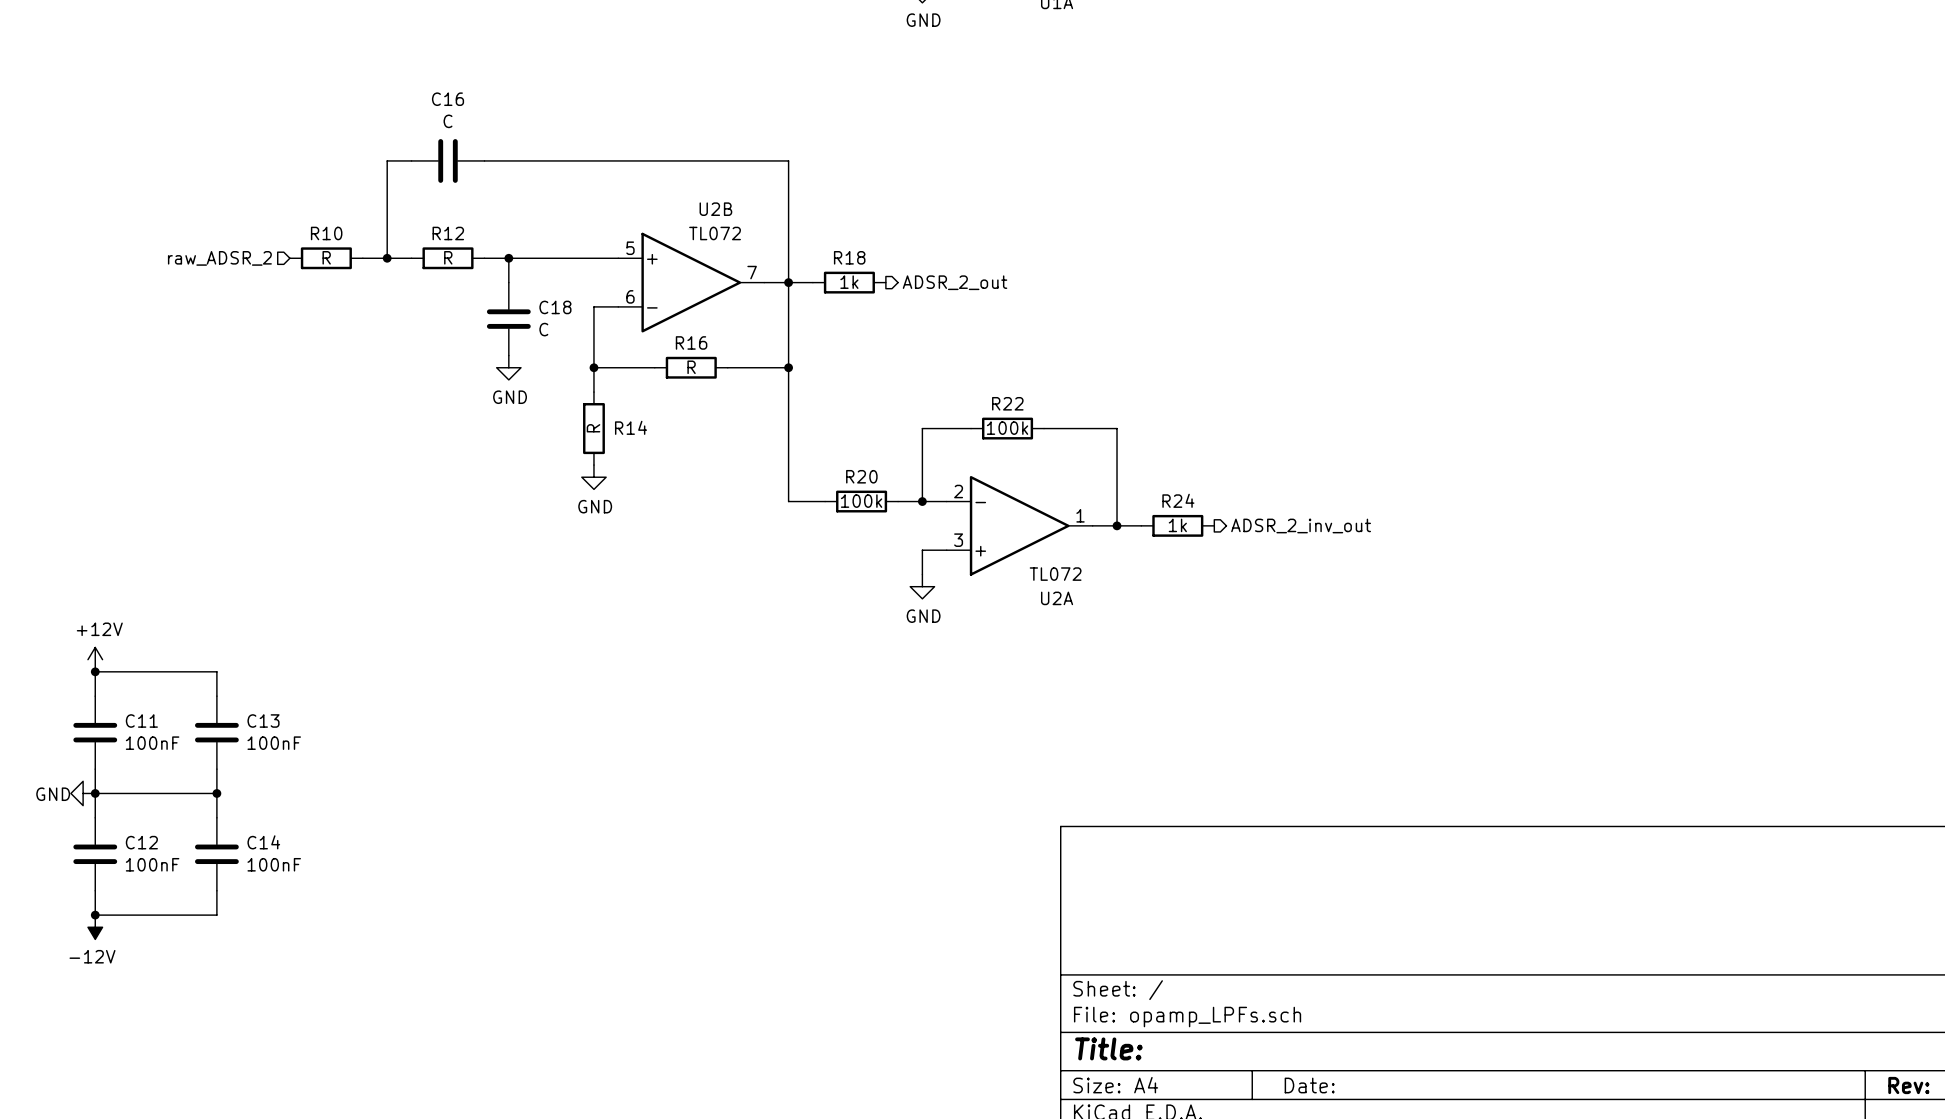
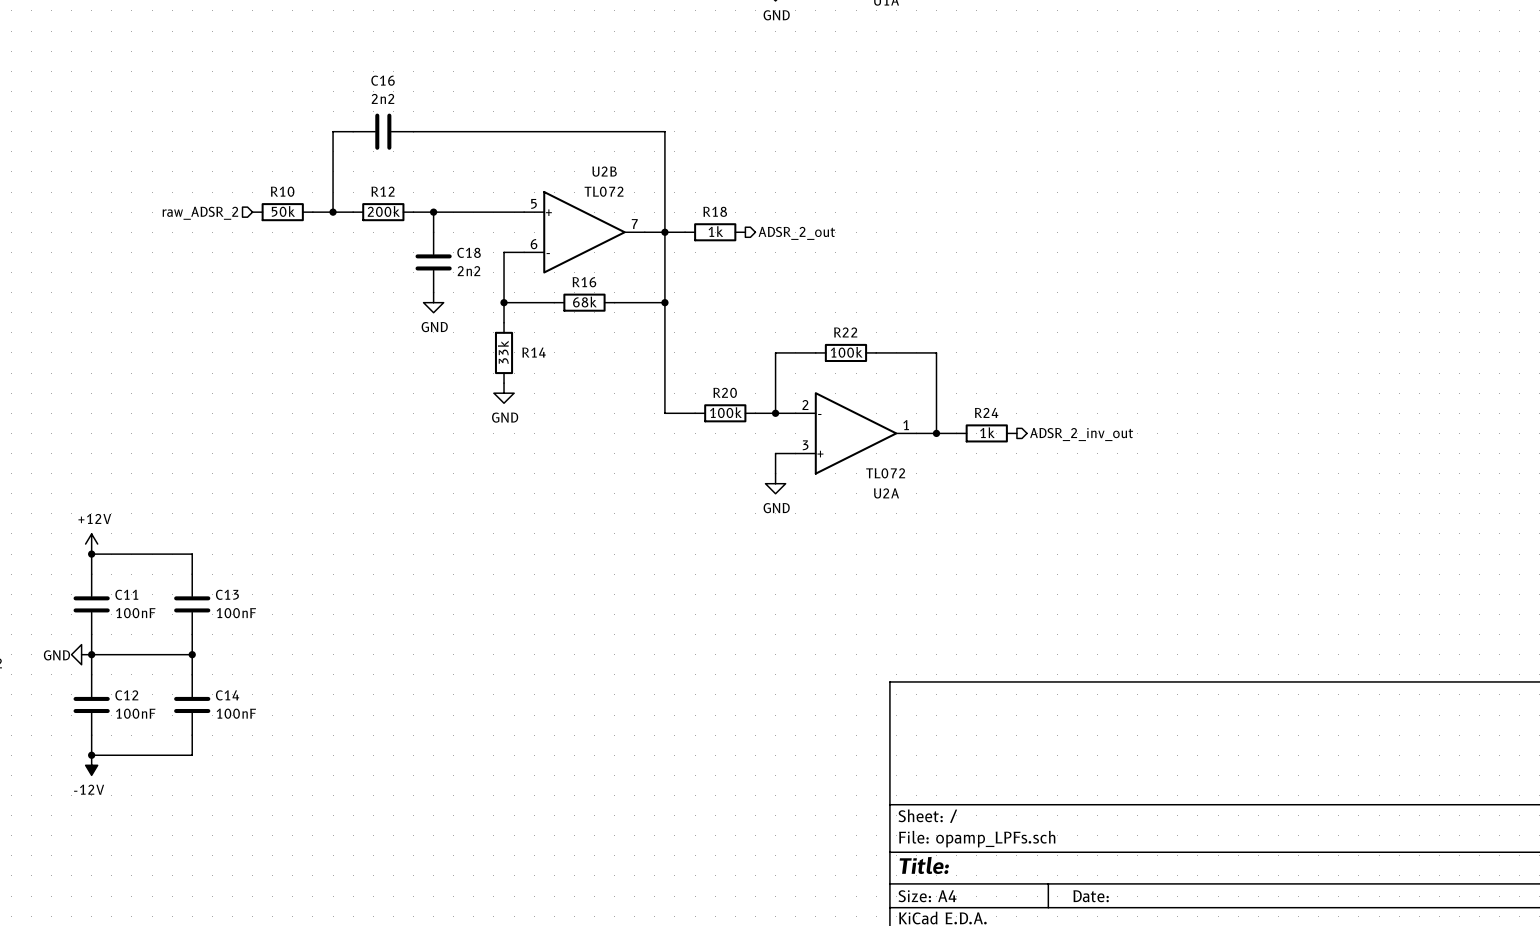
C16 value: C (448, 121) -> 2n2 (383, 98)
R10 value: R (326, 257) -> 50k (283, 211)
R12 value: R (448, 257) -> 200k (383, 211)
C18 value: C (543, 329) -> 2n2 (469, 271)
R16 value: R (691, 367) -> 68k (584, 302)
R14 value: R (593, 428) -> 33k (503, 352)

